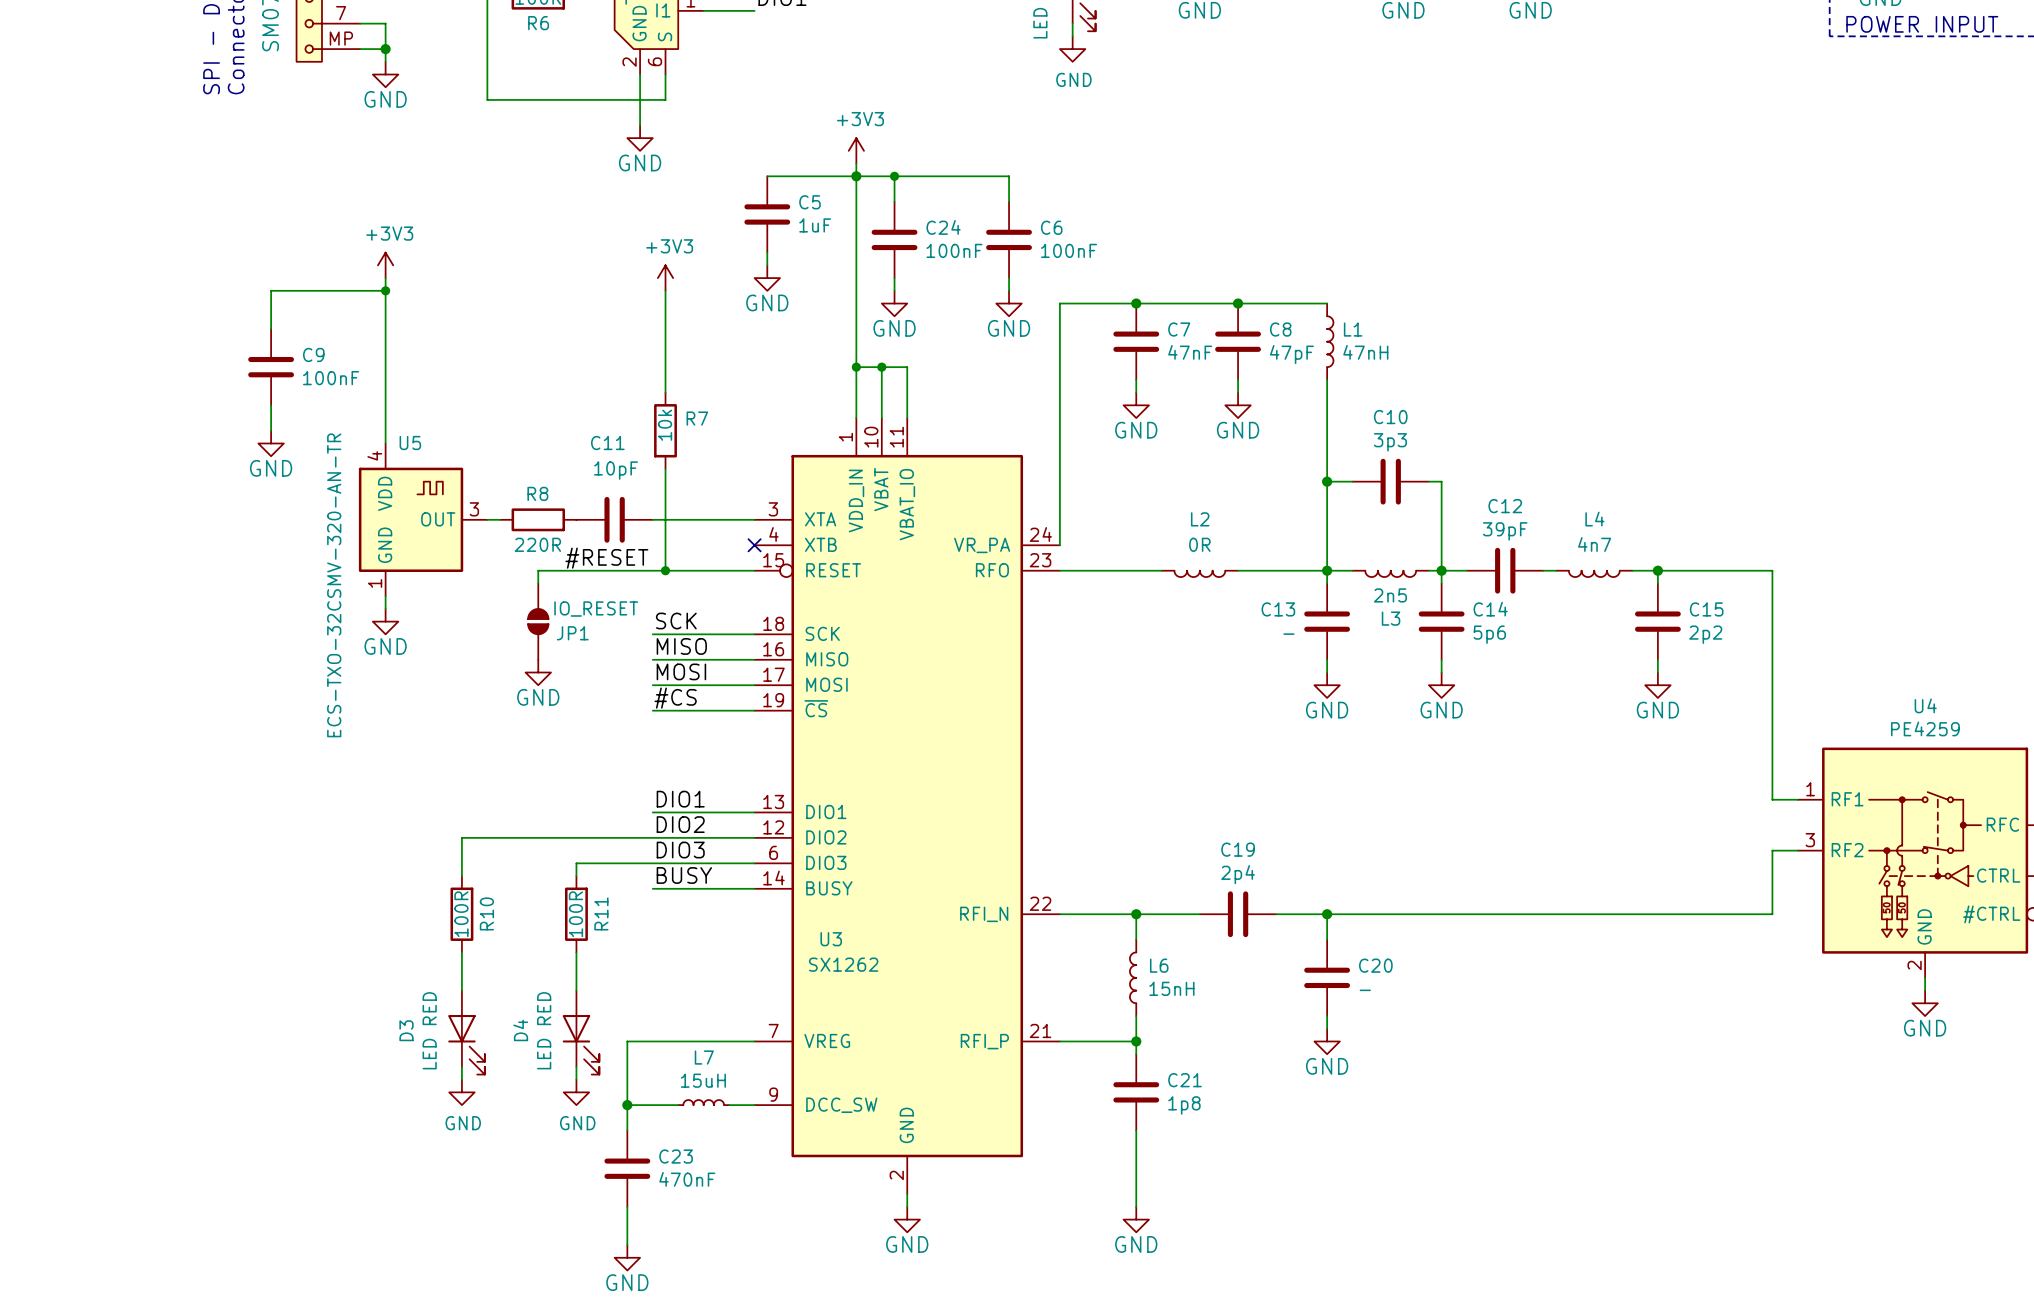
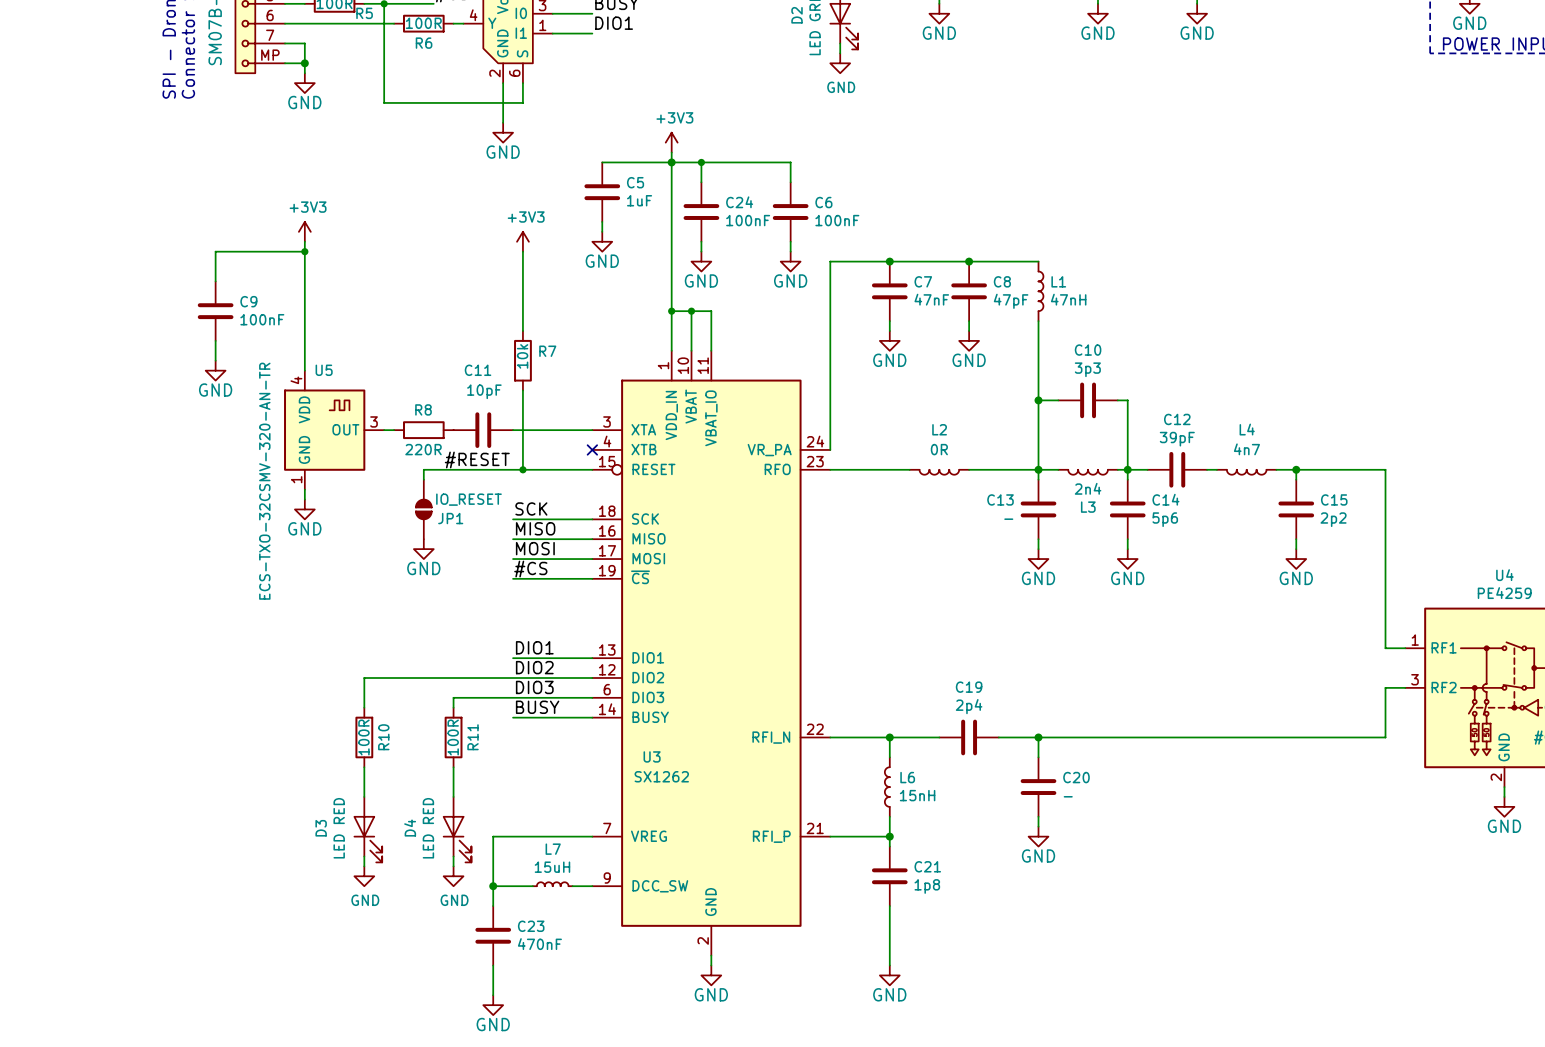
L3 value: 2n5 (1390, 595) -> 2n4 (1088, 488)

